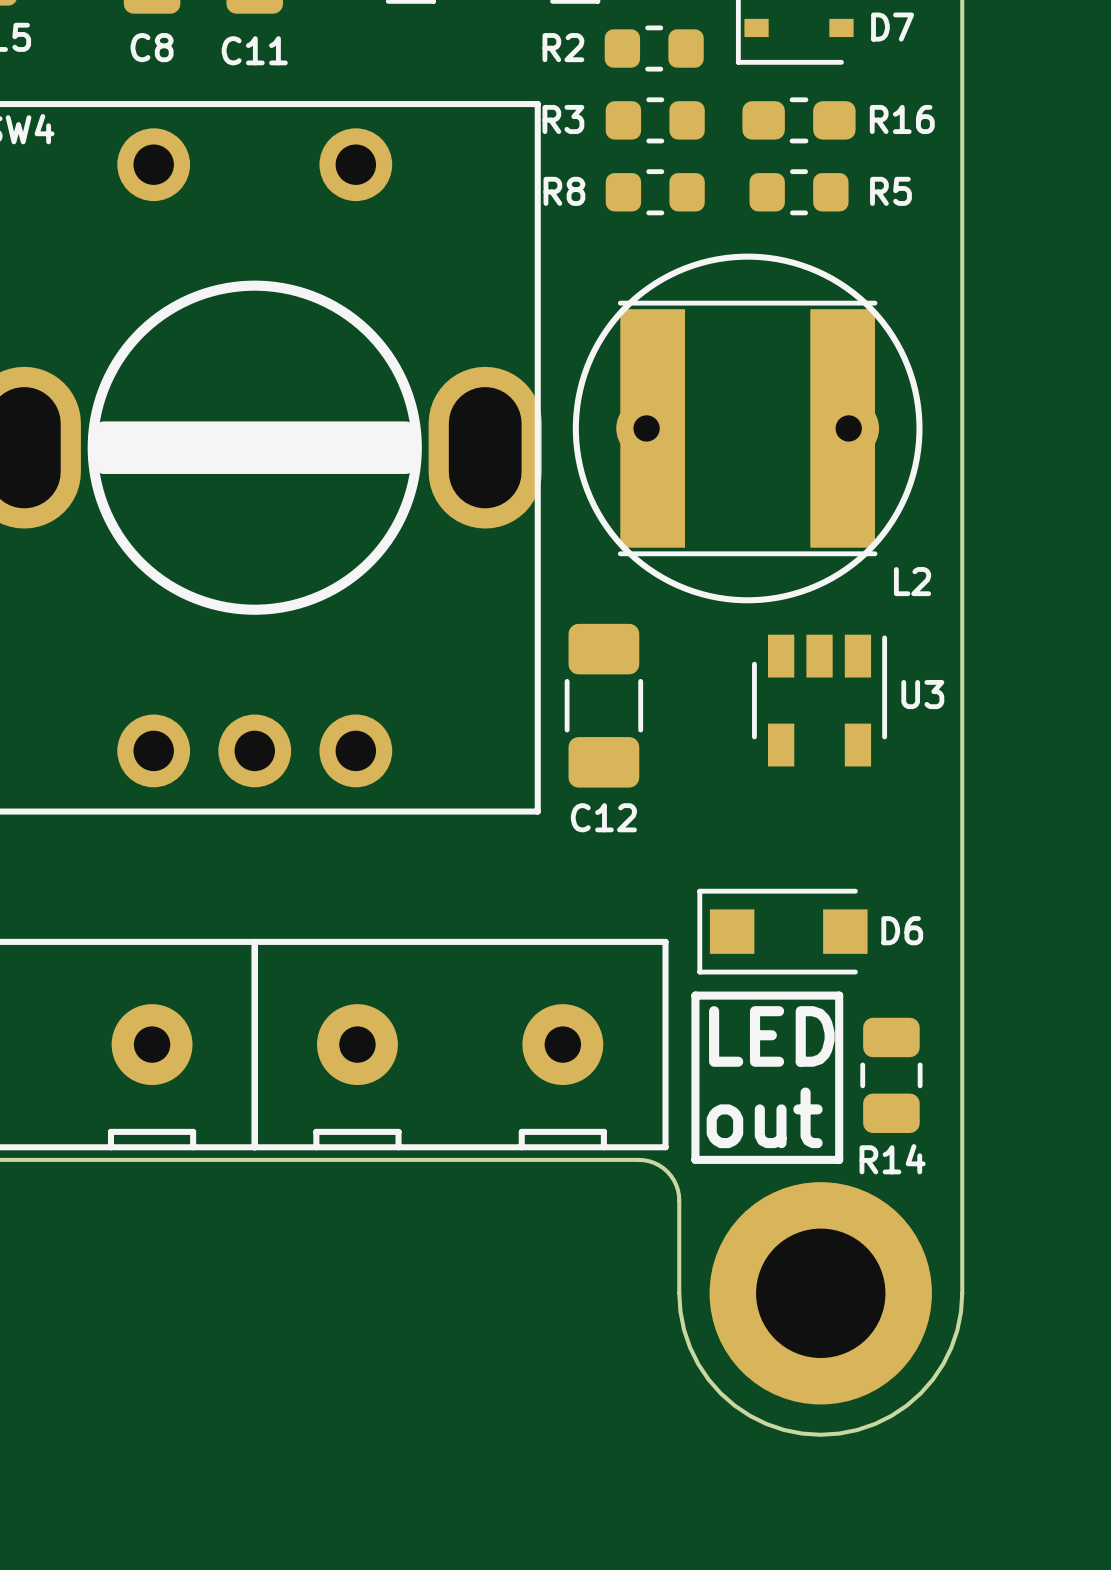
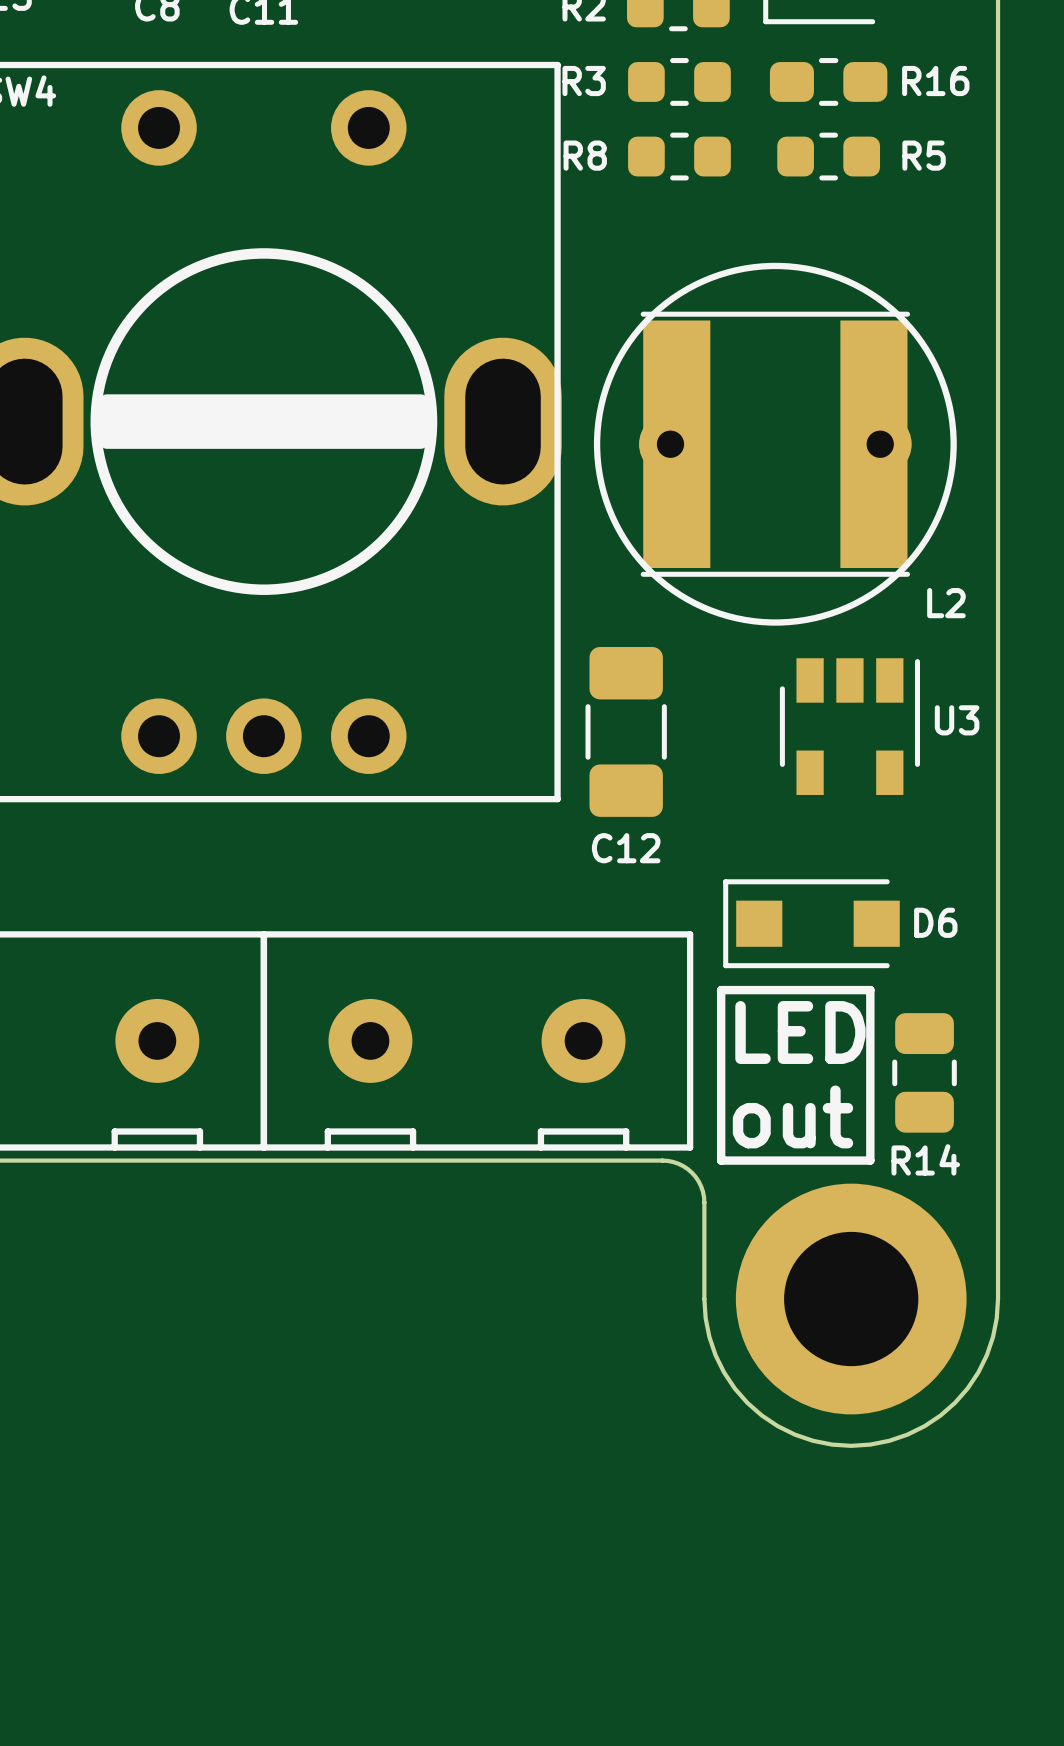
L2 position: (747, 428) -> (775, 444)
part position: (747, 428) -> (775, 444)
U3 position: (819, 700) -> (849, 726)
C12 position: (603, 705) -> (626, 731)

